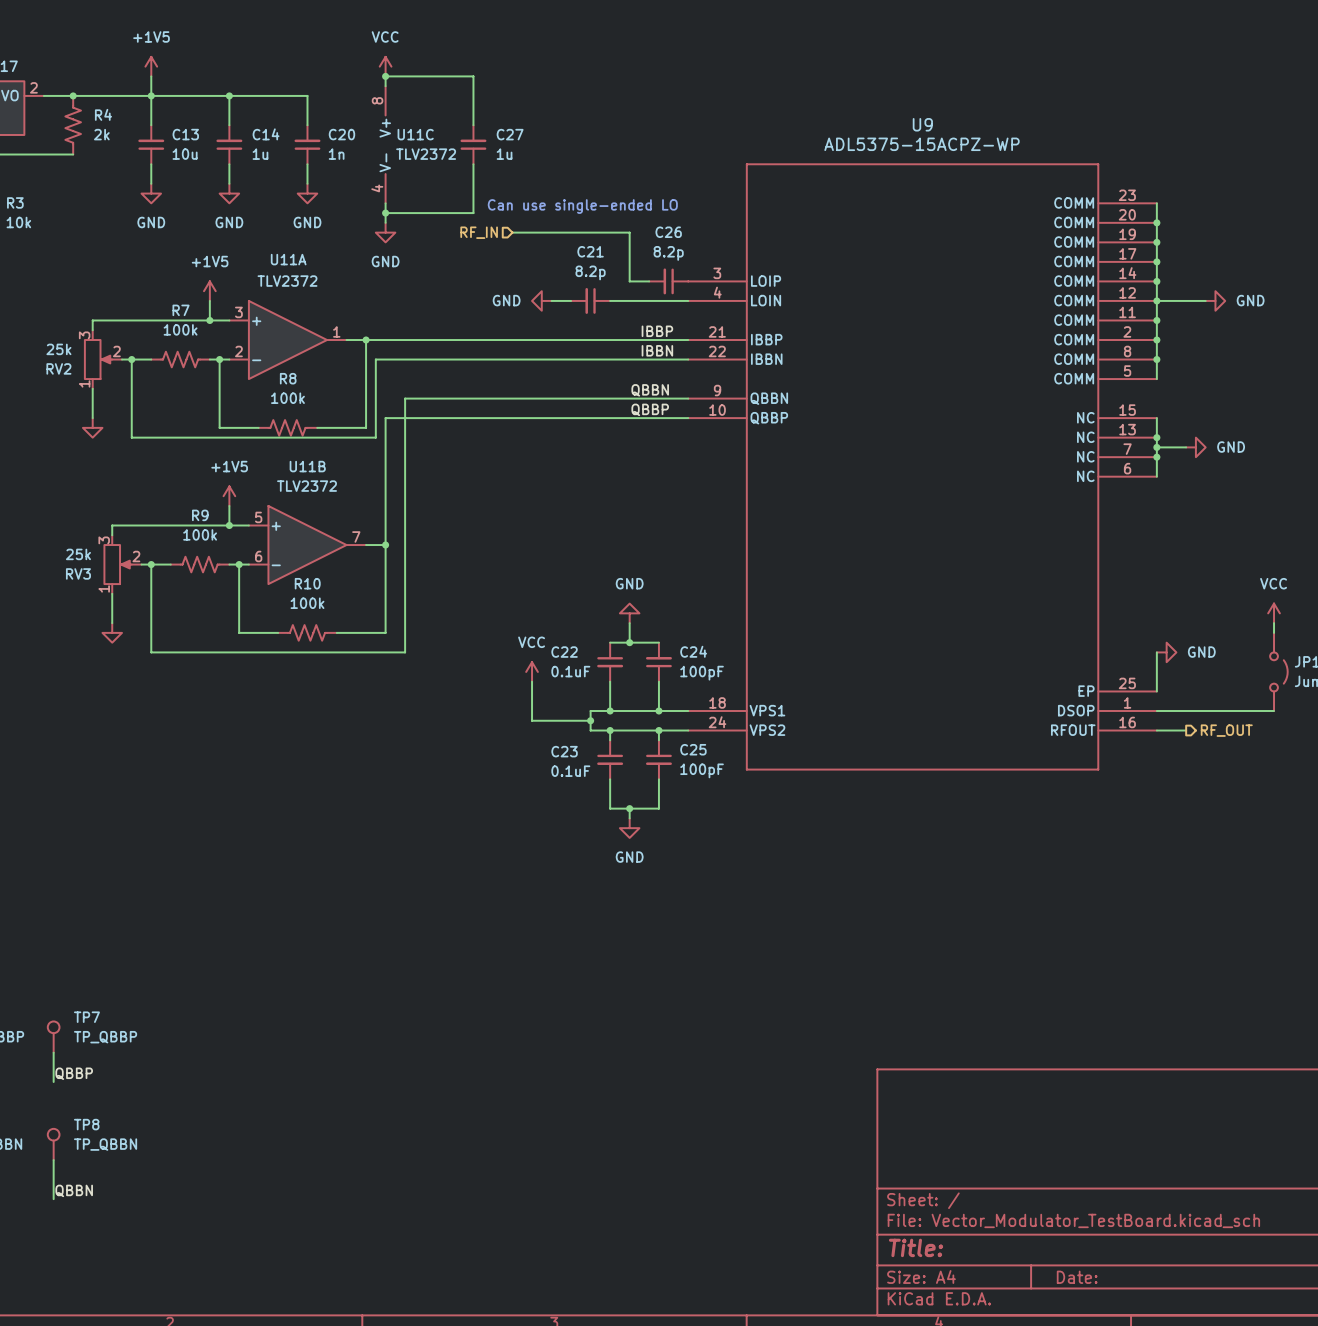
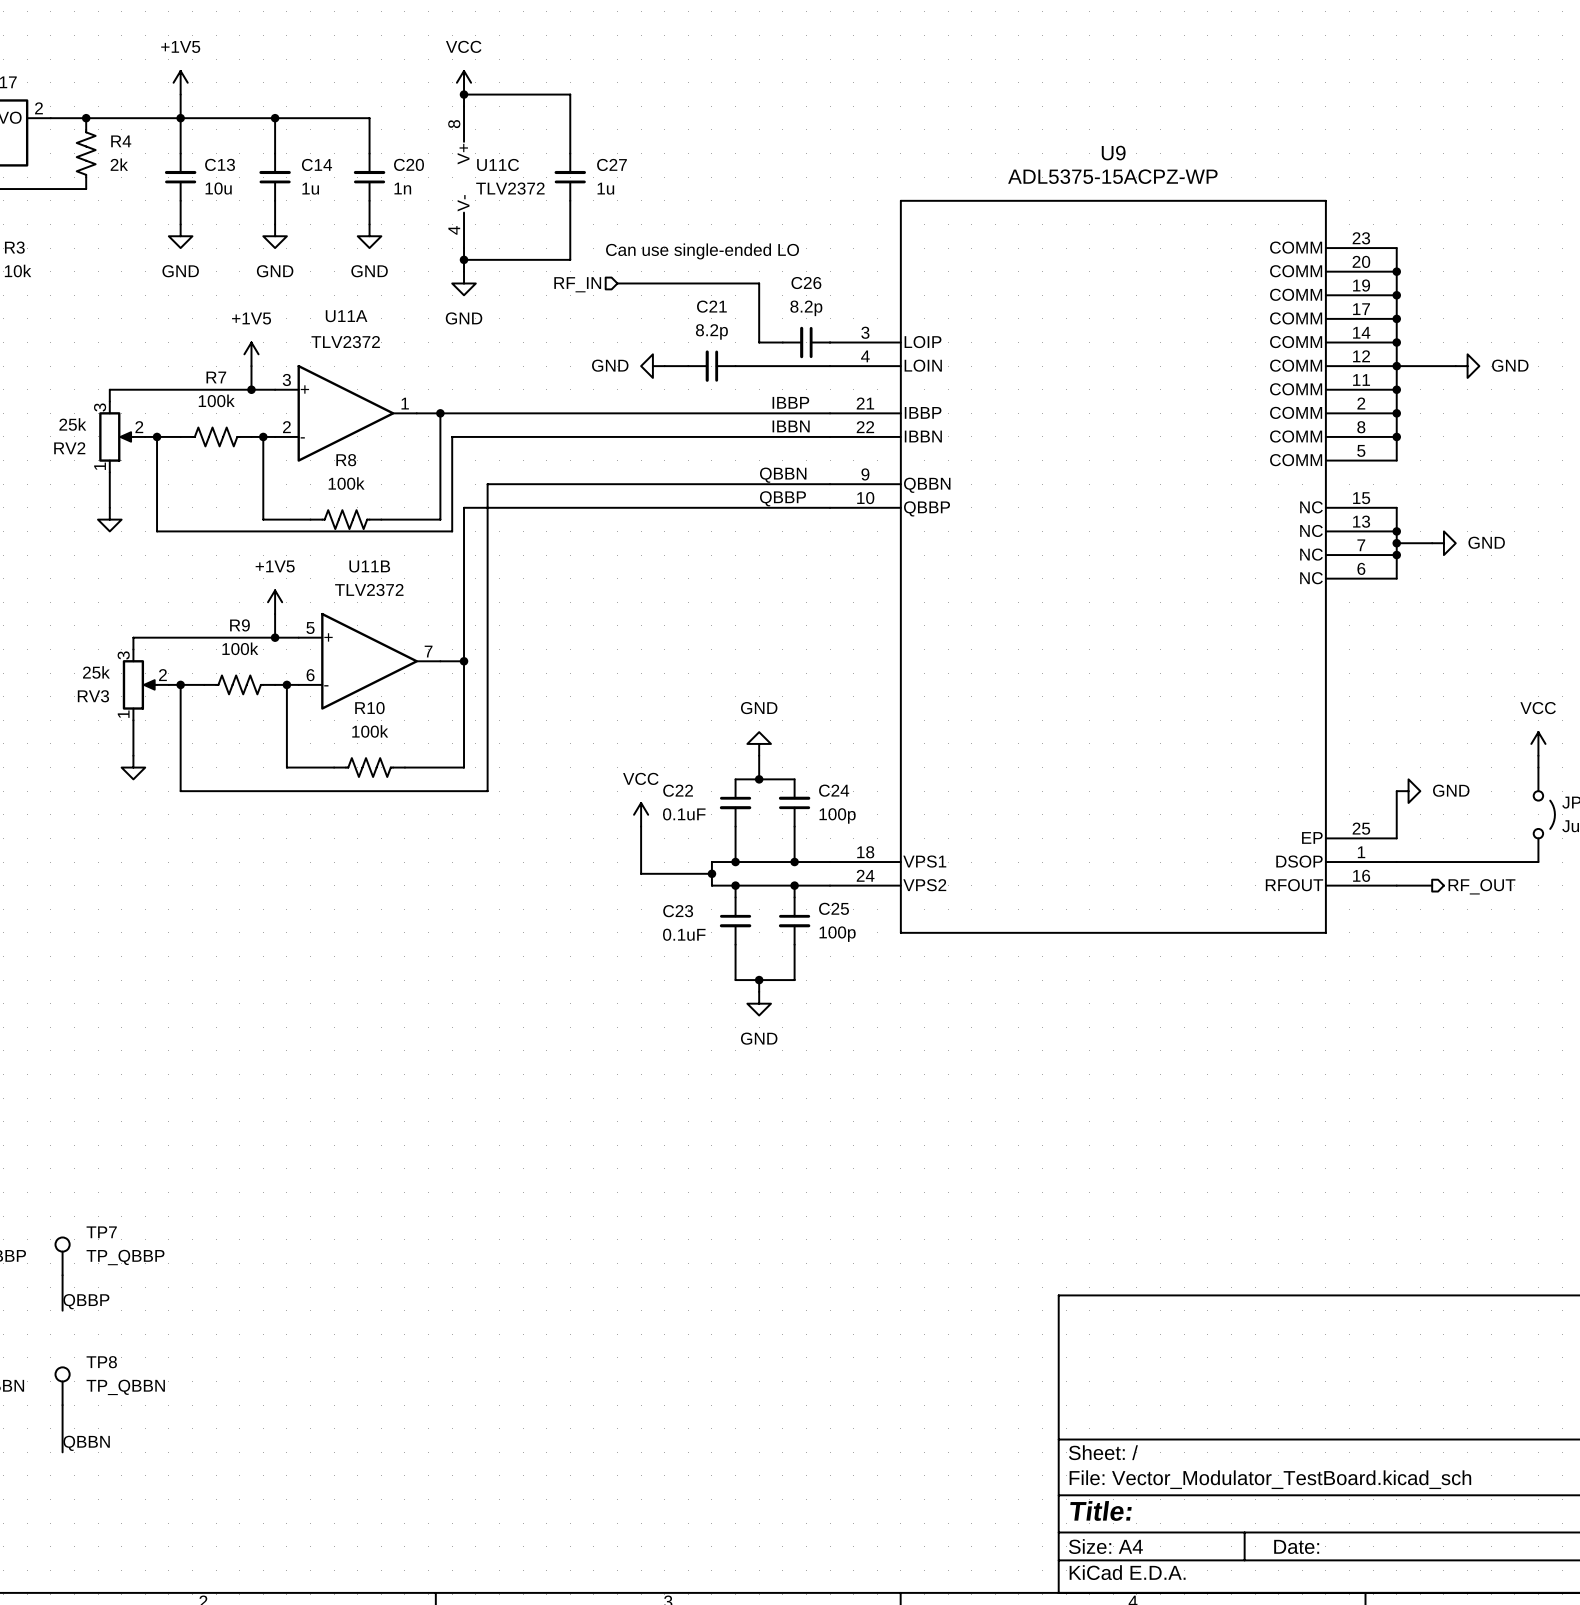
C24 value: 100pF (702, 673) -> 100p (837, 815)
C25 value: 100pF (702, 770) -> 100p (837, 934)

